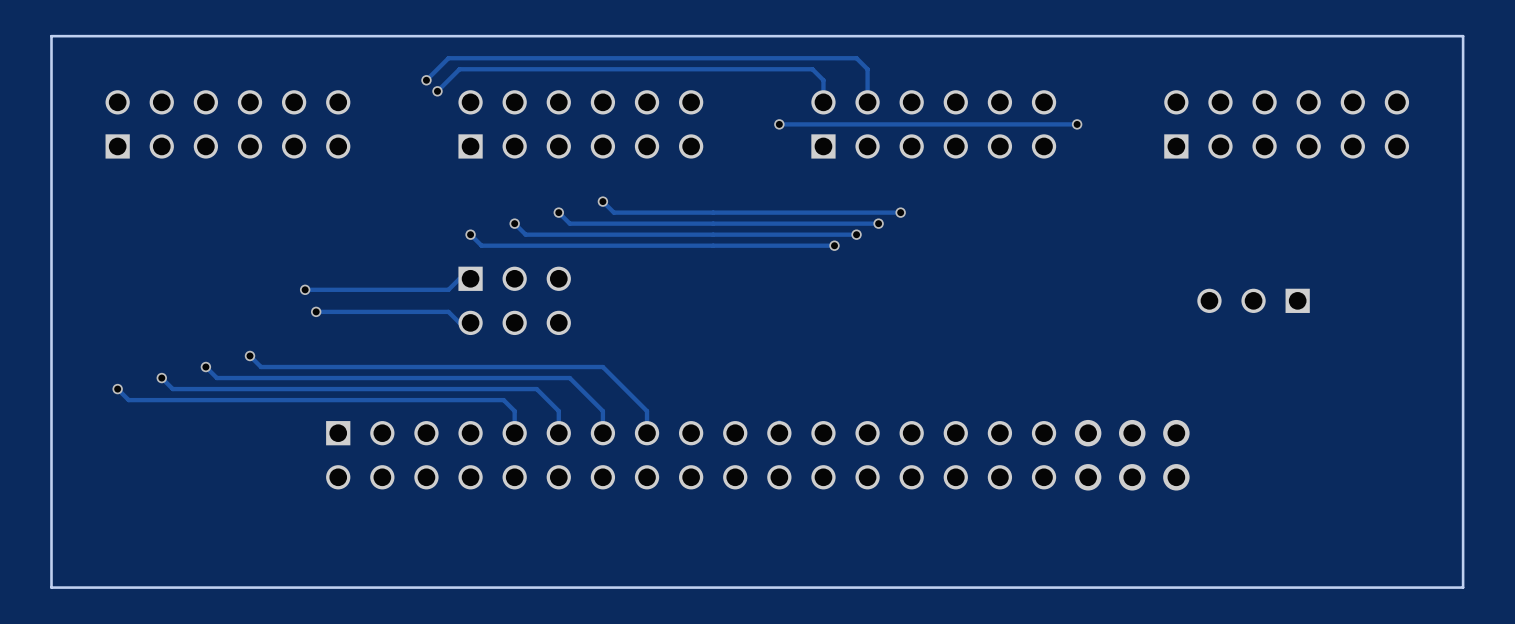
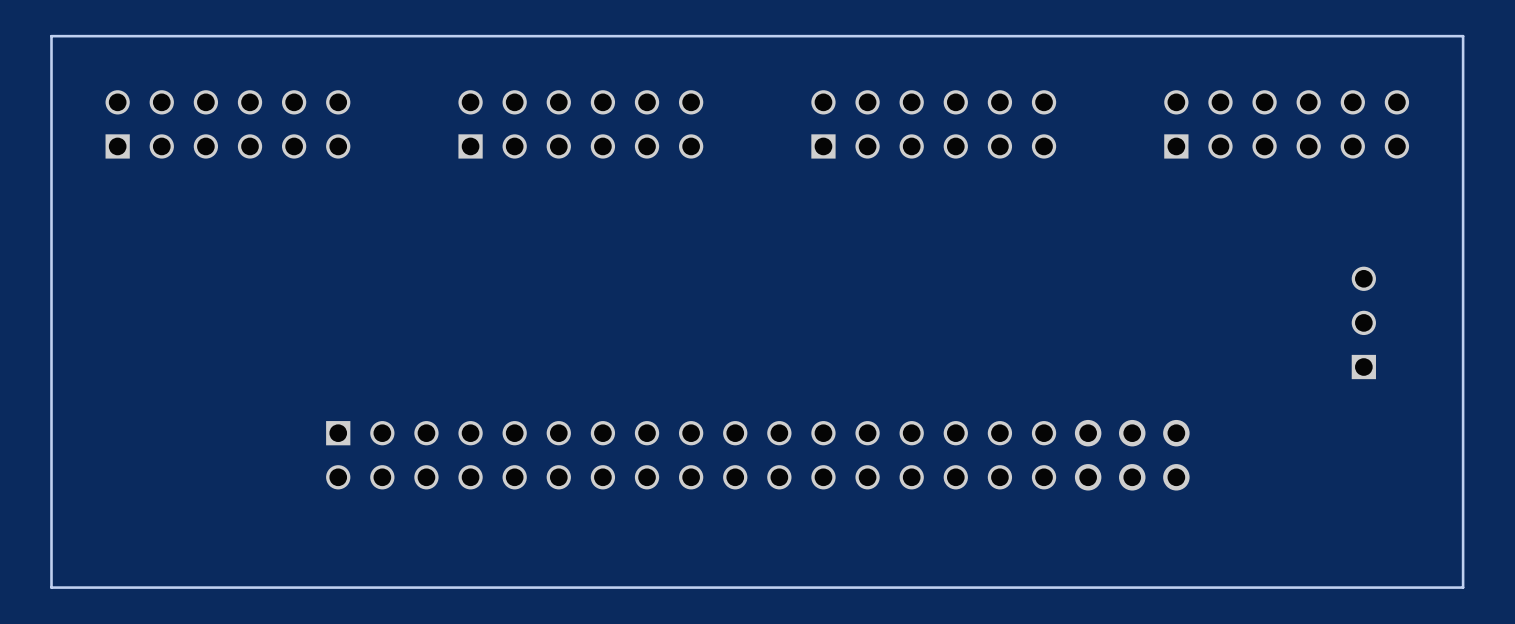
track: (426, 80) (448, 58) (856, 58) (867, 69) (867, 102) -> none
via: (426, 80) -> none
track: (437, 91) (459, 69) (812, 69) (823, 80) (823, 102) -> none
via: (437, 91) -> none
via: (779, 124) -> none
track: (1077, 124) (779, 124) -> none
via: (1077, 124) -> none
track: (602, 201) (613, 212) (900, 212) -> none
via: (602, 201) -> none
track: (558, 212) (569, 223) (878, 223) -> none
via: (558, 212) -> none
via: (900, 212) -> none
track: (514, 223) (525, 234) (856, 234) -> none
via: (514, 223) -> none
via: (878, 223) -> none
track: (470, 234) (481, 245) (834, 245) -> none
via: (470, 234) -> none
via: (856, 234) -> none
via: (834, 245) -> none
track: (470, 278) (459, 278) (448, 289) (305, 289) -> none
via: (305, 289) -> none
part: (514, 300) -> none
part rotation: 0° (1253, 300) -> 90° clockwise (1363, 322)
part position: (1253, 300) -> (1363, 322)
track: (316, 311) (448, 311) (459, 322) (470, 322) -> none
via: (316, 311) -> none
track: (250, 355) (261, 367) (602, 367) (647, 411) (647, 433) -> none
via: (250, 355) -> none
track: (205, 367) (216, 378) (569, 378) (602, 411) (602, 433) -> none
via: (205, 367) -> none
track: (161, 378) (172, 389) (536, 389) (558, 411) (558, 433) -> none
via: (161, 378) -> none
track: (117, 389) (128, 400) (503, 400) (514, 411) (514, 433) -> none
via: (117, 389) -> none

